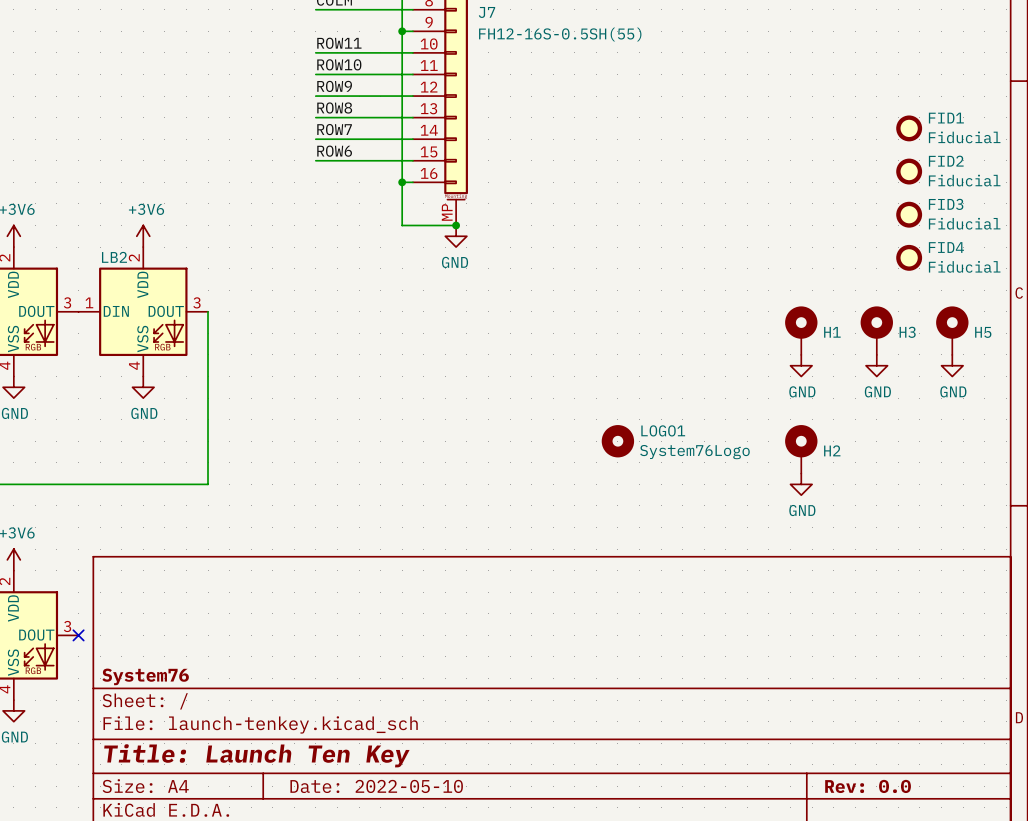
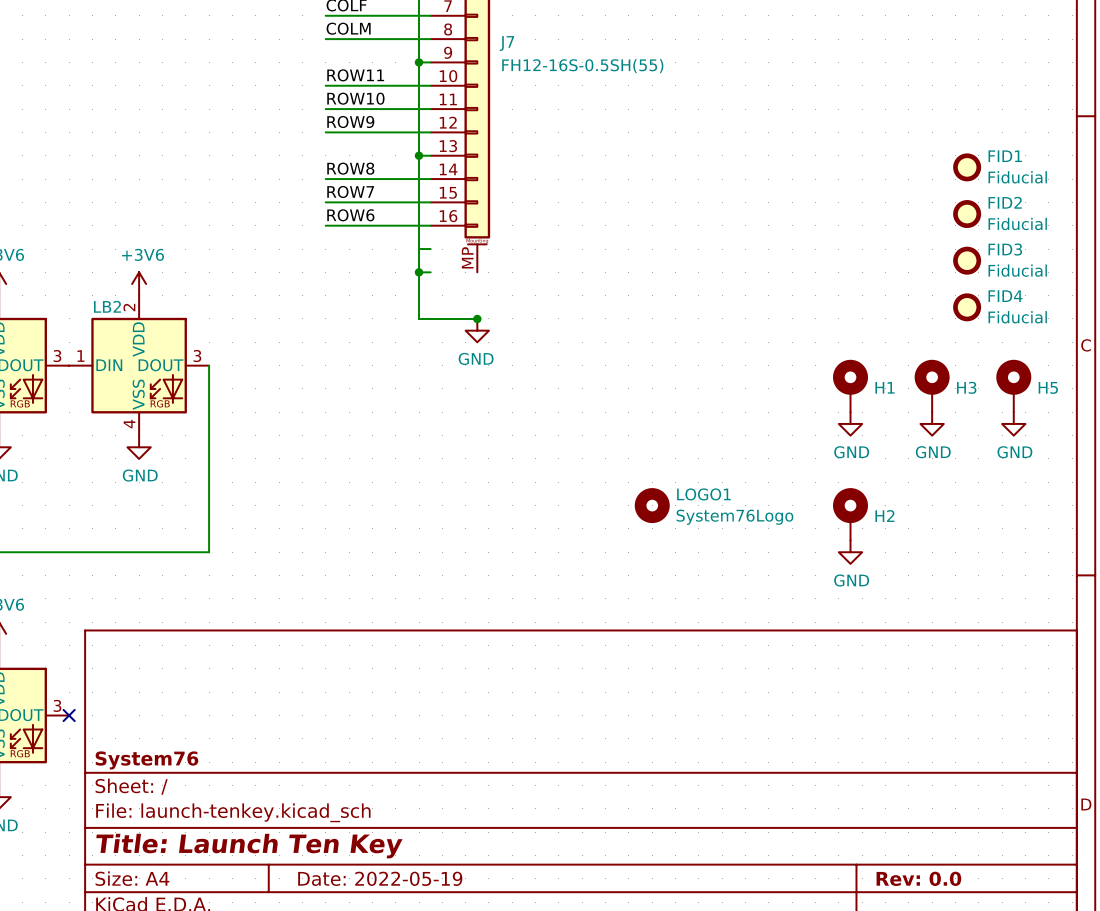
label: ROW8 (334, 107) -> none
wire: (315, 117) (402, 117) -> (325, 225) (419, 225)
junction: none -> (419, 155)
label: ROW7 (334, 129) -> ROW8 (350, 168)
label: ROW6 (334, 151) -> ROW7 (350, 191)
label: none -> ROW6 (350, 215)
junction: (402, 182) -> none
wire: none -> (419, 249) (430, 249)
wire: none -> (419, 272) (419, 318) (477, 318)
junction: none -> (419, 272)
wire: (412, 225) (456, 225) -> none
junction: (456, 225) -> none
power symbol position: GND (456, 236) -> GND (477, 330)
junction: none -> (477, 318)
title block: Date: 2022-05-10 (376, 786) -> Date: 2022-05-19 (380, 878)

